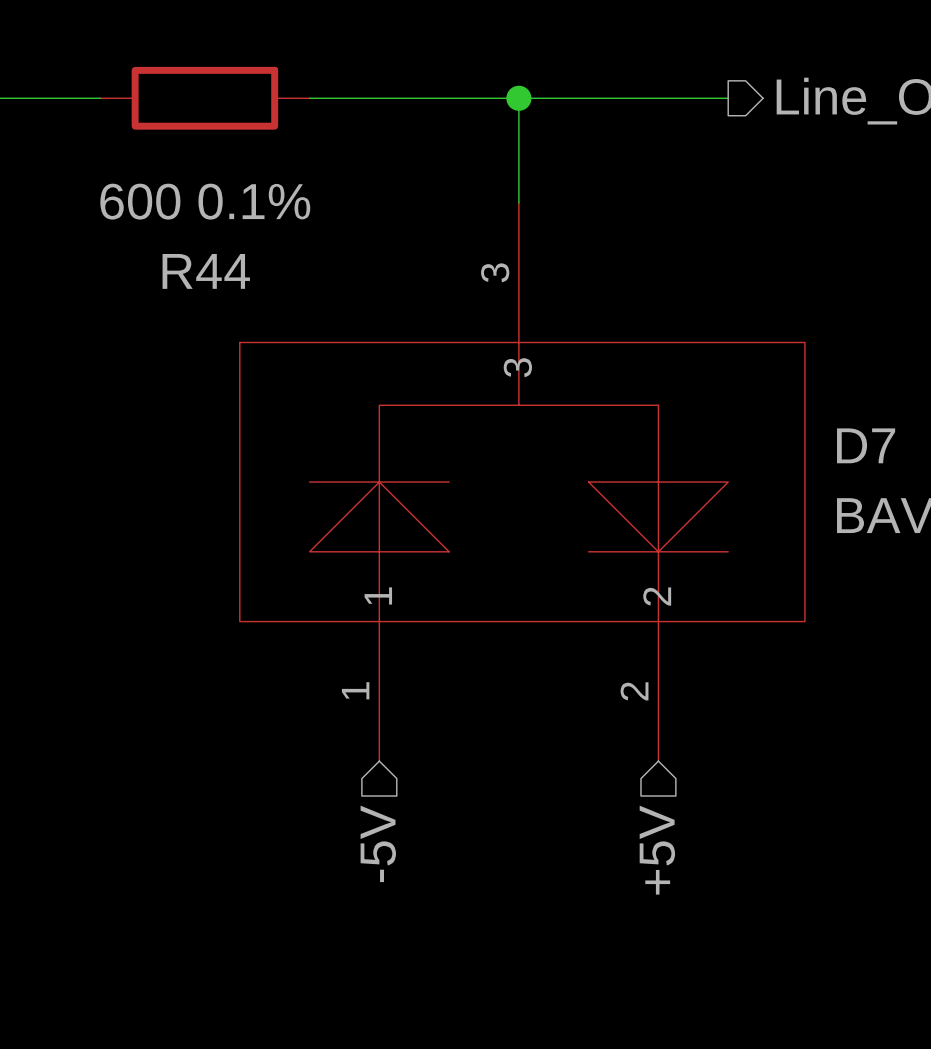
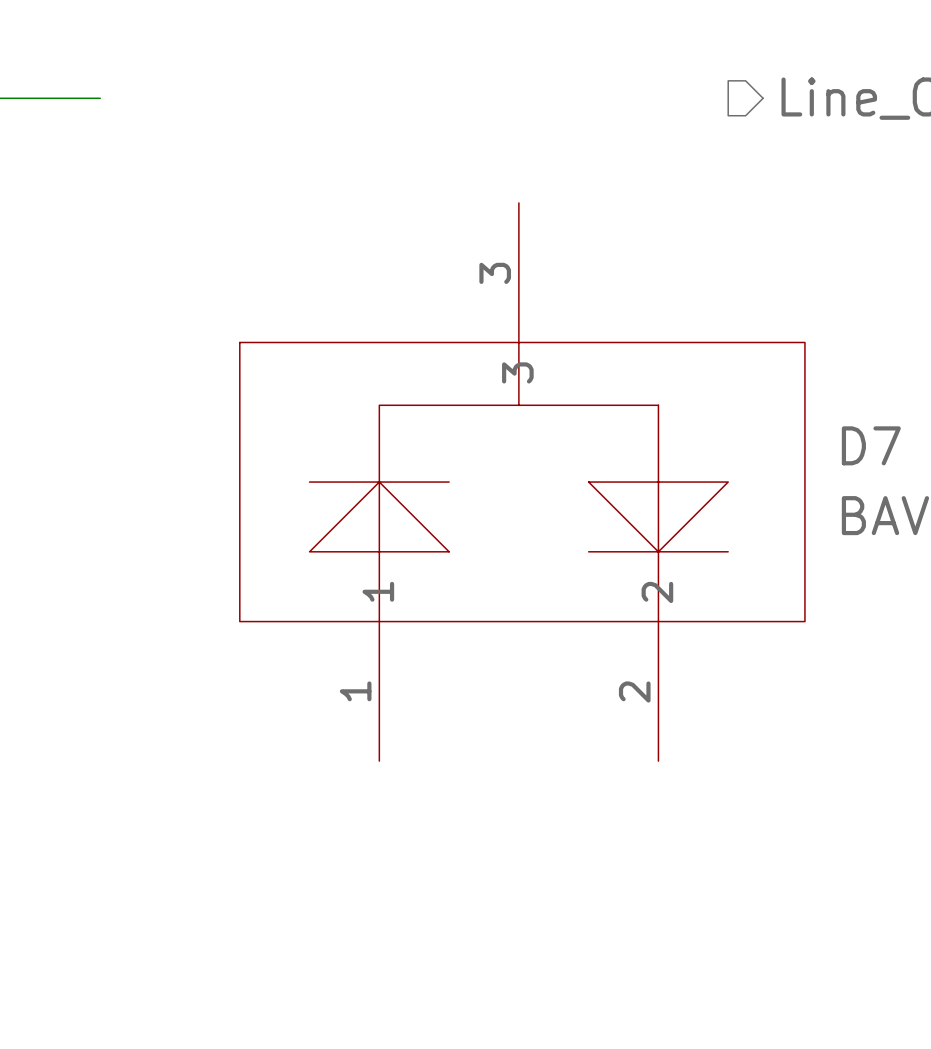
R44: 600 0.1% (204, 98) -> none
wire: (309, 98) (728, 98) -> none
wire: (518, 98) (518, 202) -> none
junction: (518, 98) -> none
hierarchical label: -5V (378, 843) -> none
hierarchical label: +5V (657, 850) -> none

